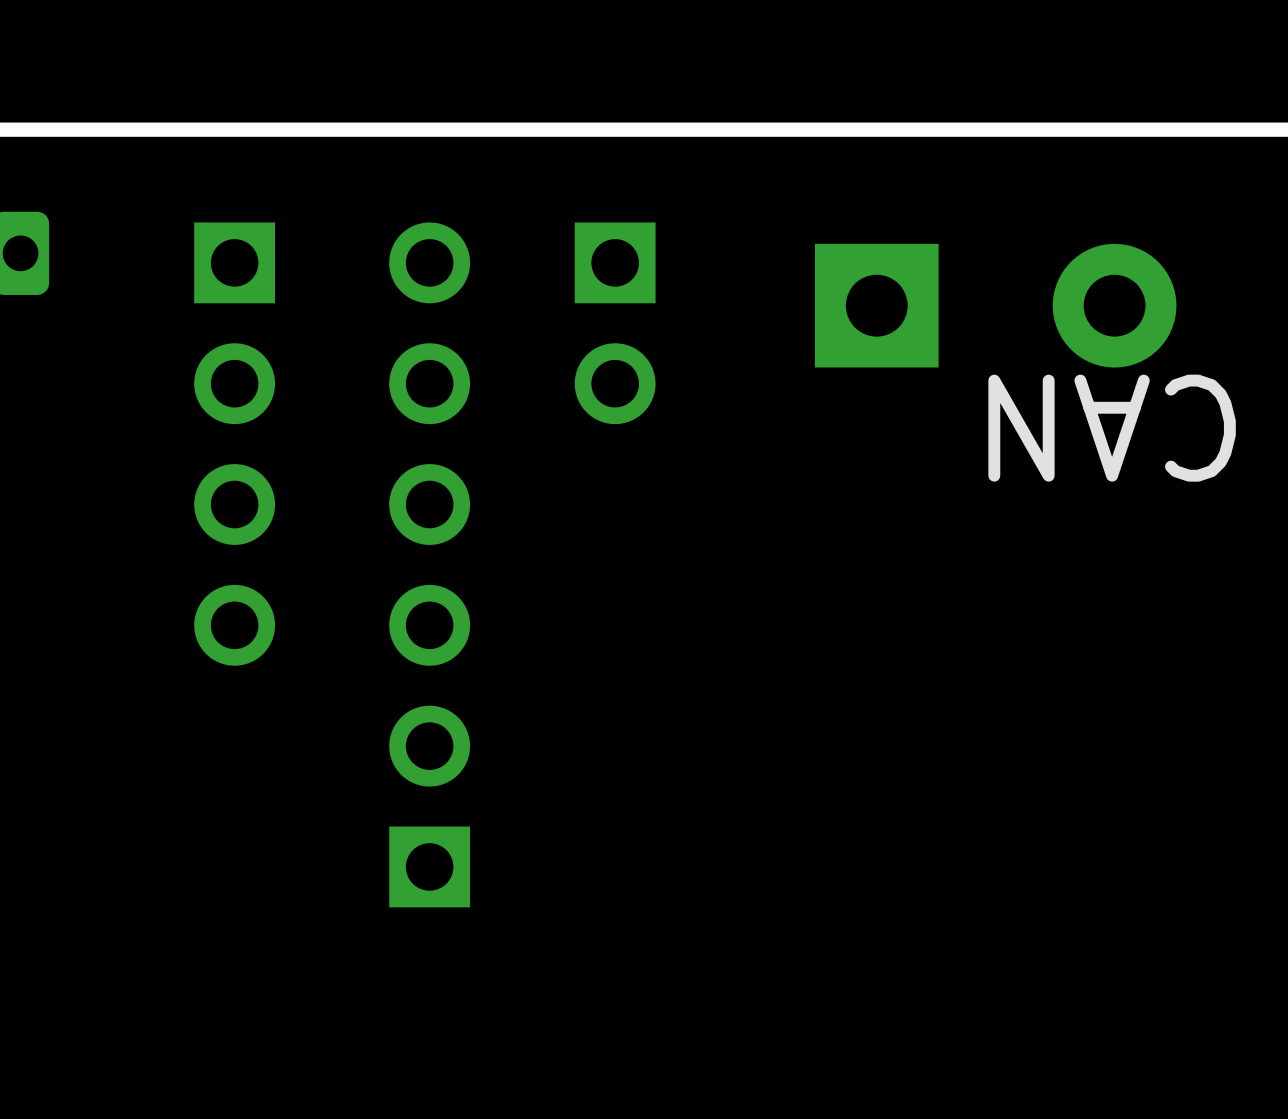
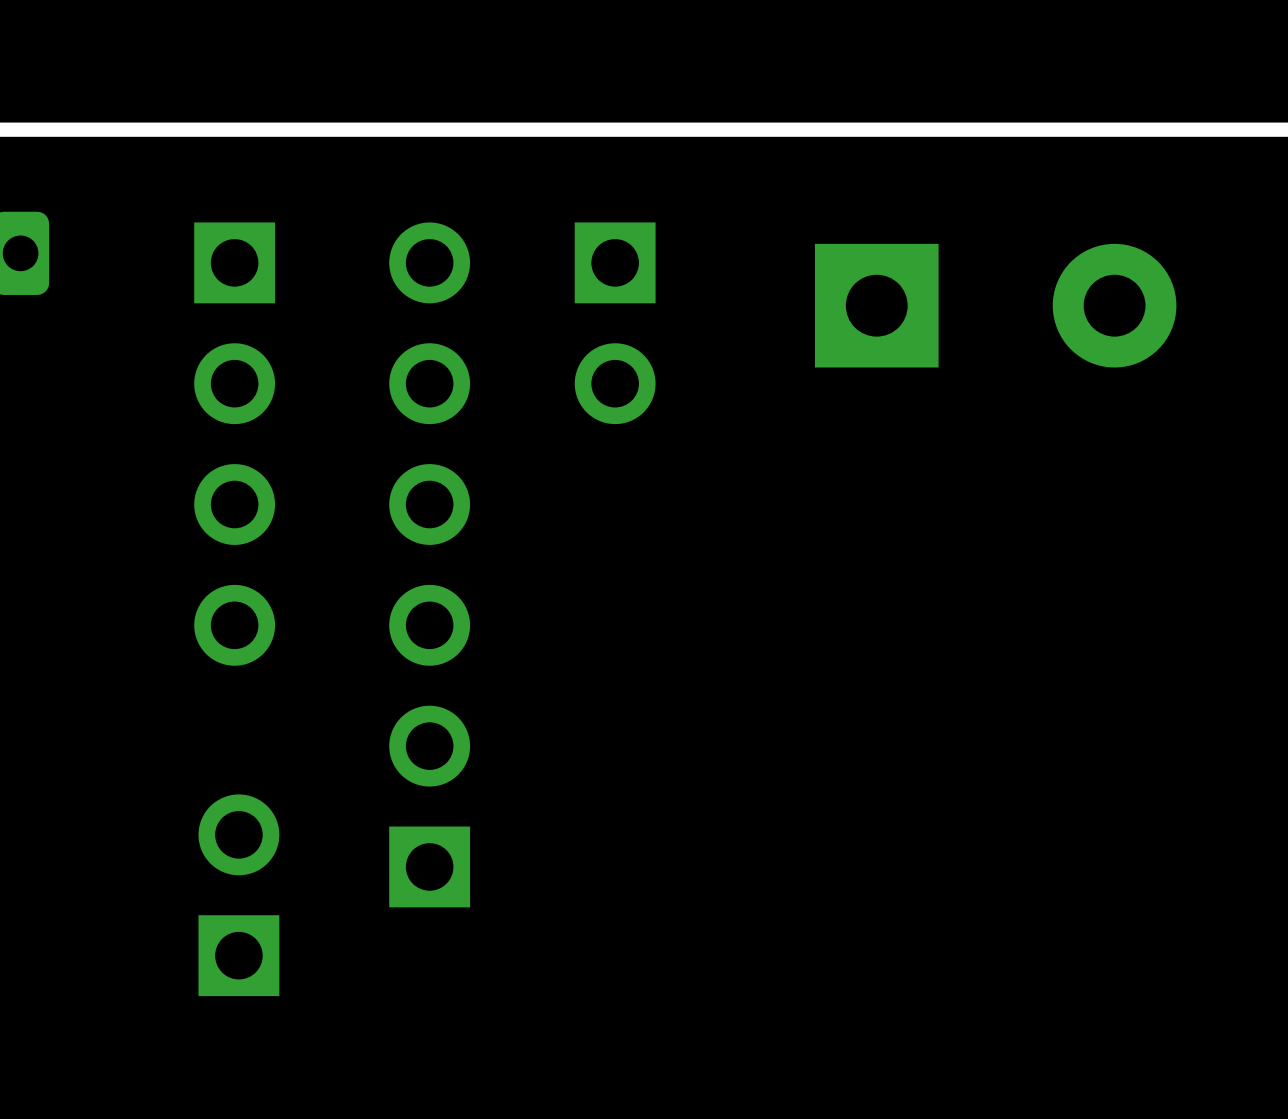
text: CAN (1112, 428) -> none
part: none -> (238, 895)

